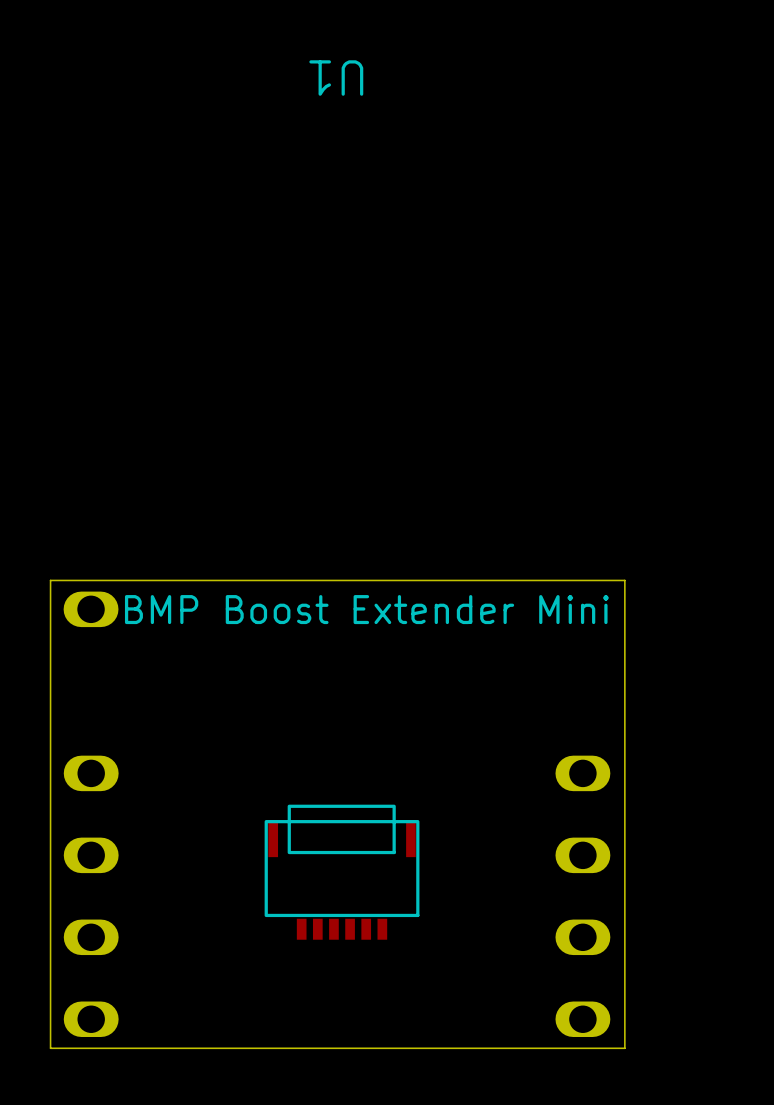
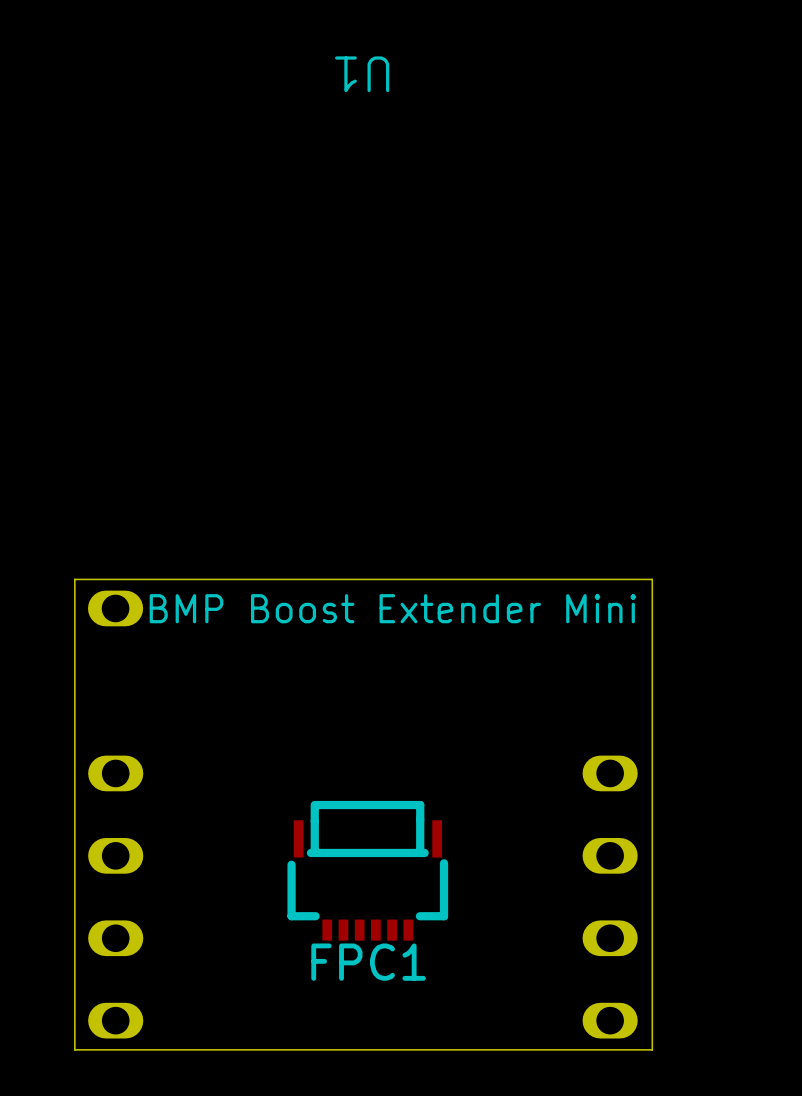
FPC1: none -> (367, 870)
part: (342, 872) -> none

